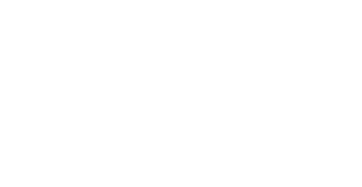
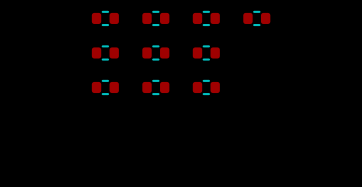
part: none -> (105, 18)
part: none -> (155, 18)
part: none -> (206, 18)
part: none -> (256, 18)
part: none -> (105, 52)
part: none -> (155, 52)
part: none -> (206, 52)
part: none -> (105, 87)
part: none -> (155, 87)
part: none -> (206, 87)

